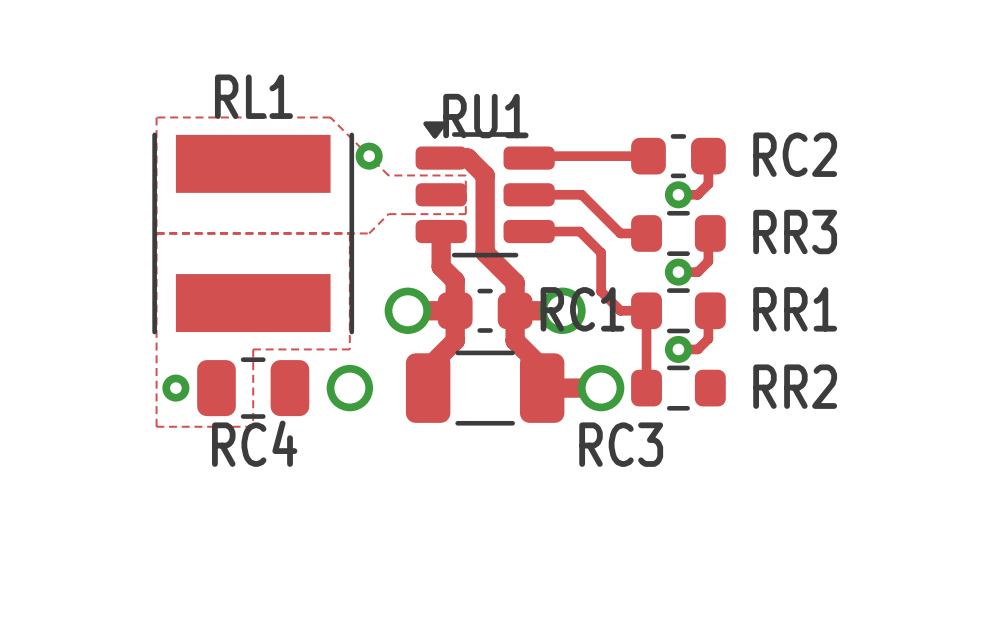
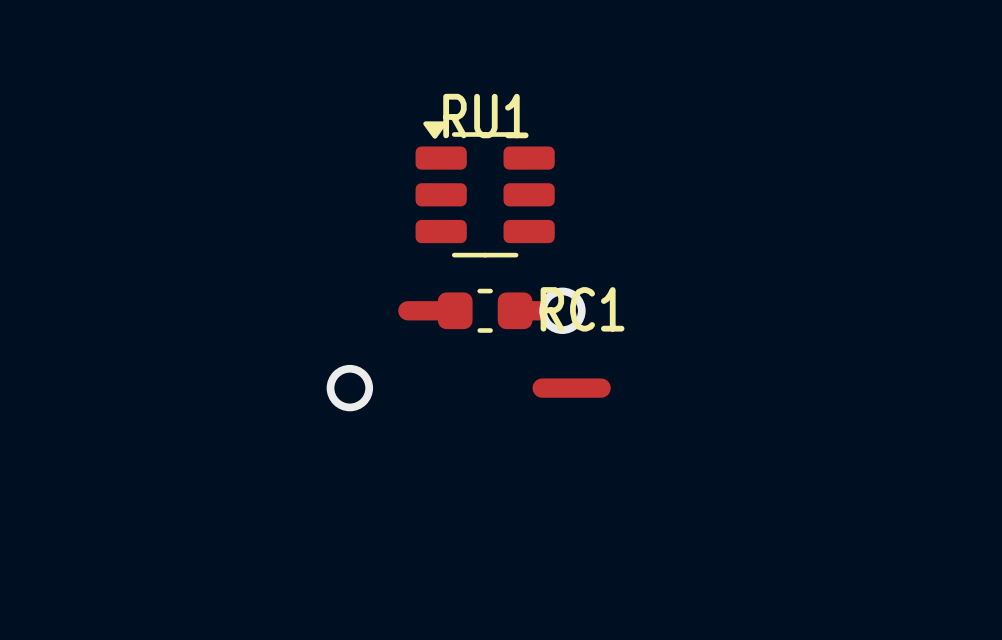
via: (369, 156) -> none
track: (531, 156) (648, 156) -> none
RC2: (678, 156) -> none
track: (708, 156) (708, 184) (697, 194) (678, 194) -> none
track: (441, 158) (467, 158) (485, 175) (485, 252) (515, 282) (515, 340) (542, 367) -> none
track: (529, 194) (581, 194) (620, 233) (646, 233) -> none
via: (678, 194) -> none
track: (441, 231) (441, 266) (455, 280) (455, 340) (428, 367) -> none
track: (529, 231) (579, 231) (601, 252) (601, 291) (620, 310) (646, 310) (646, 388) -> none
zone outline: (156, 233) (369, 233) (388, 214) (465, 214) (465, 175) (388, 175) (330, 117) (156, 117) (156, 426) (253, 426) (253, 349) (349, 349) (349, 233) -> none
RL1: (253, 233) -> none
RR3: (678, 233) -> none
track: (708, 233) (708, 261) (697, 272) (678, 272) -> none
via: (678, 272) -> none
via: (407, 310) -> none
RR1: (678, 310) -> none
track: (708, 310) (708, 338) (697, 349) (678, 349) -> none
via: (678, 349) -> none
via: (175, 388) -> none
RC4: (253, 388) -> none
RC3: (485, 388) -> none
via: (601, 388) -> none
RR2: (678, 388) -> none

